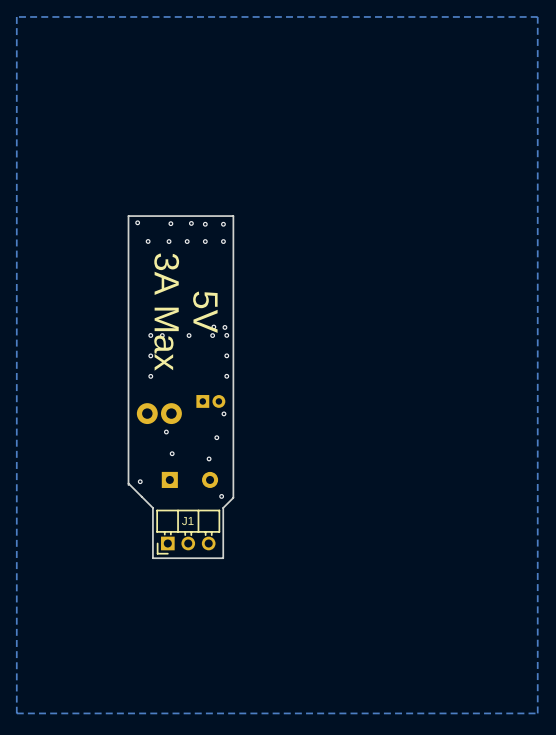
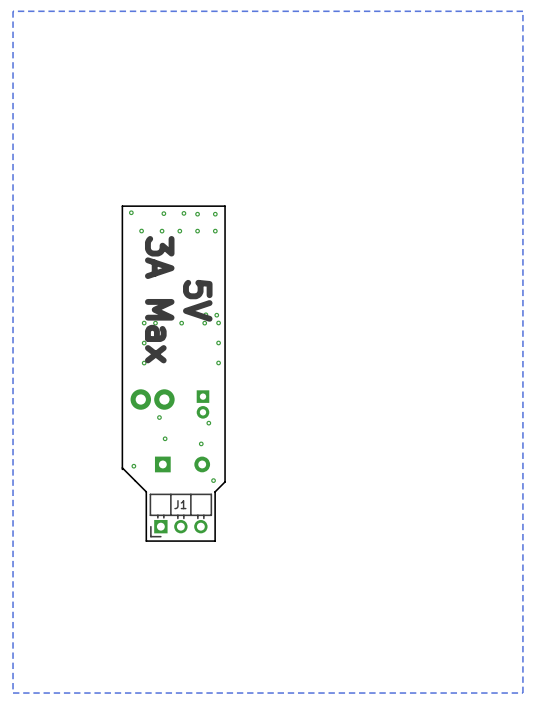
part rotation: 0° (210, 401) -> 90° clockwise (202, 404)
via: (223, 413) -> none

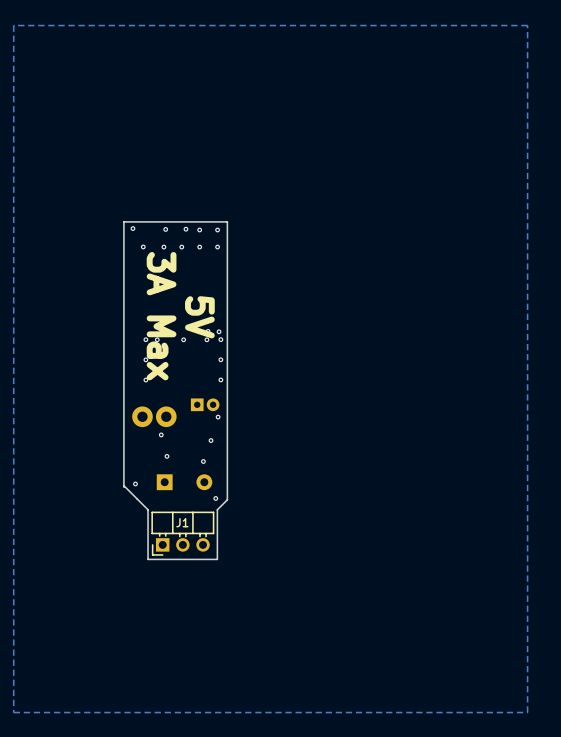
via: none -> (218, 417)
part rotation: 0° (202, 404) -> 90° counterclockwise (205, 404)

